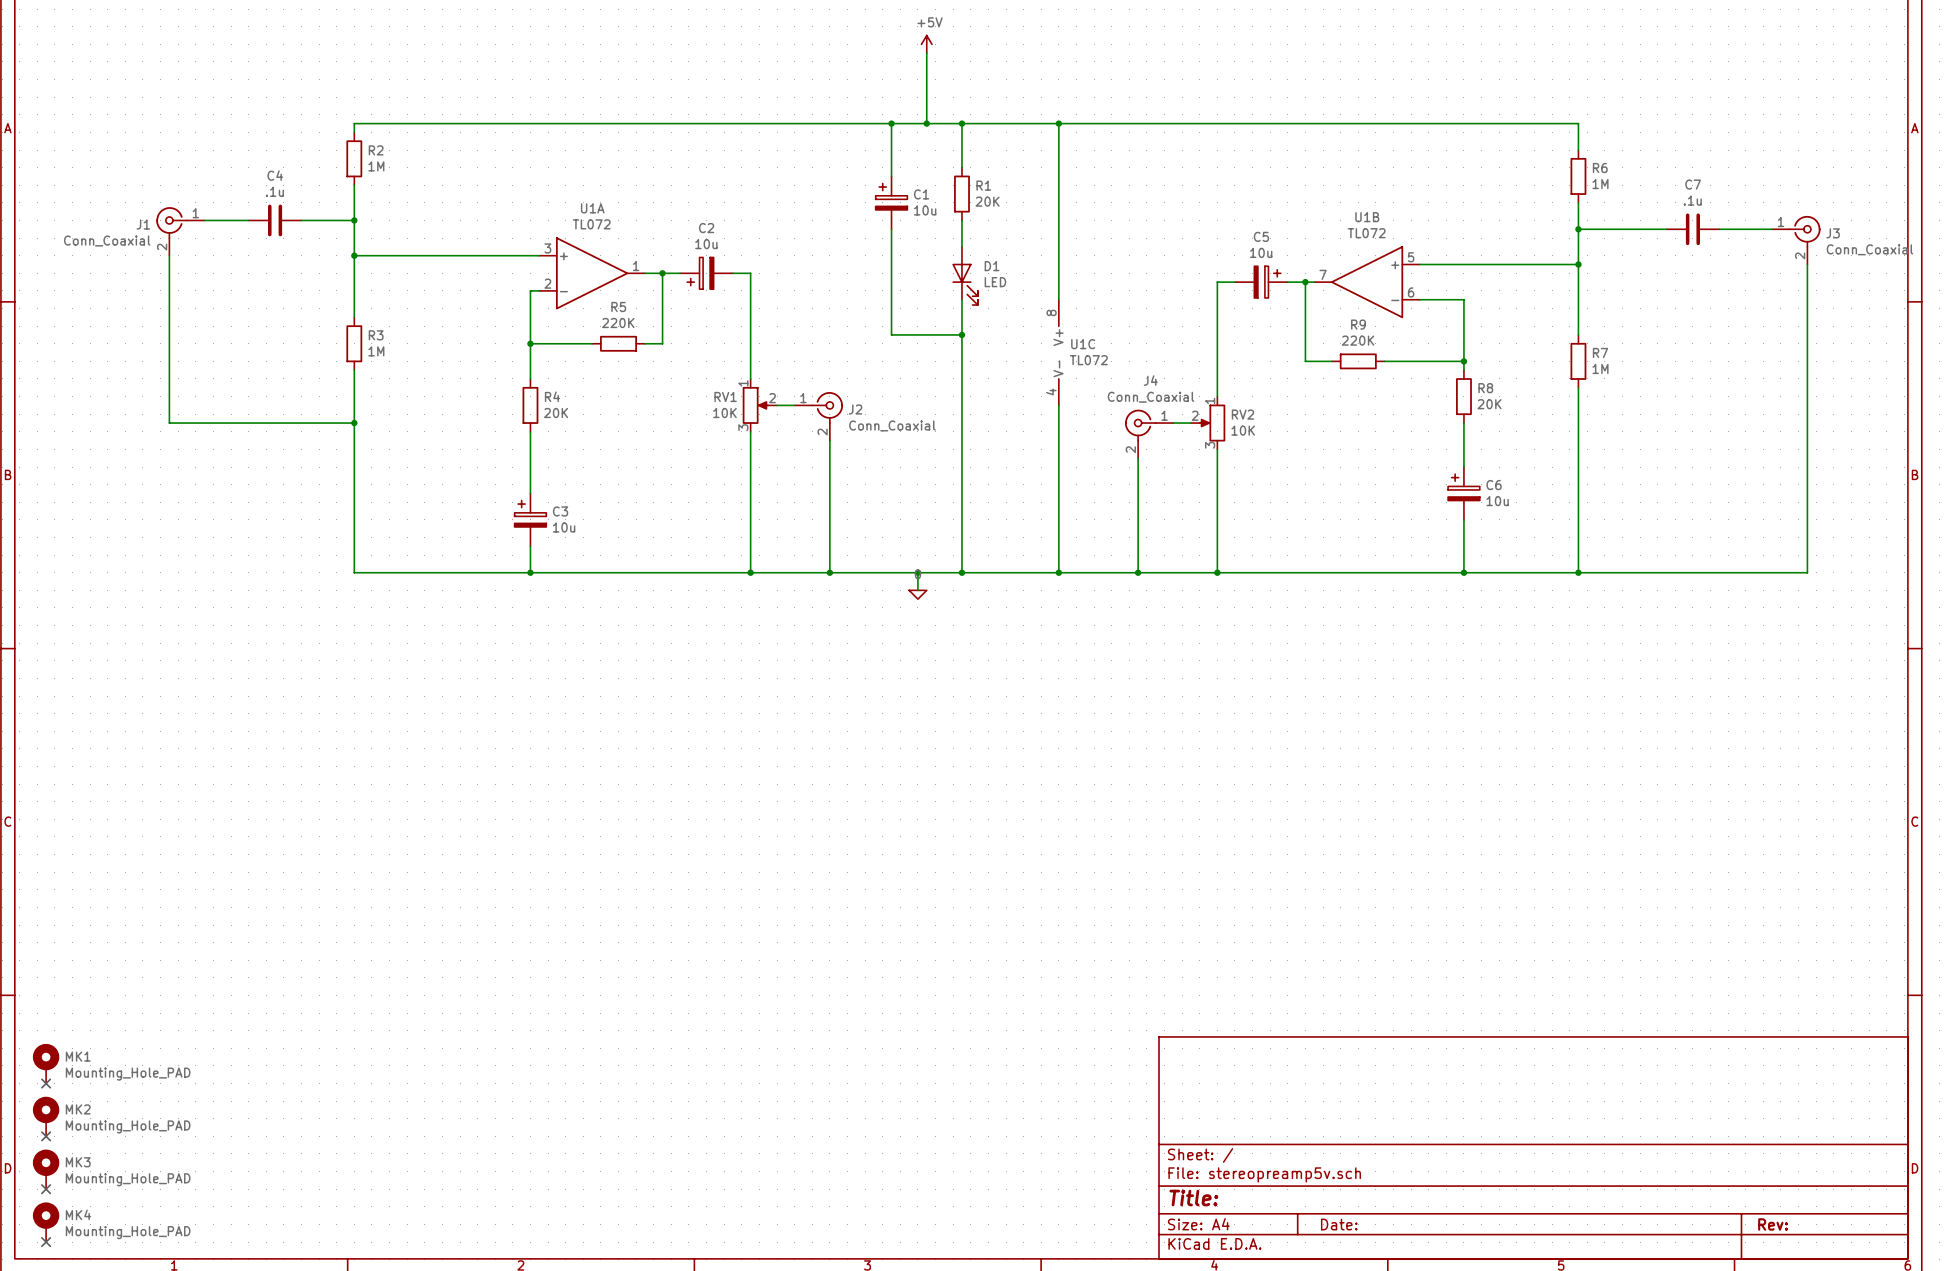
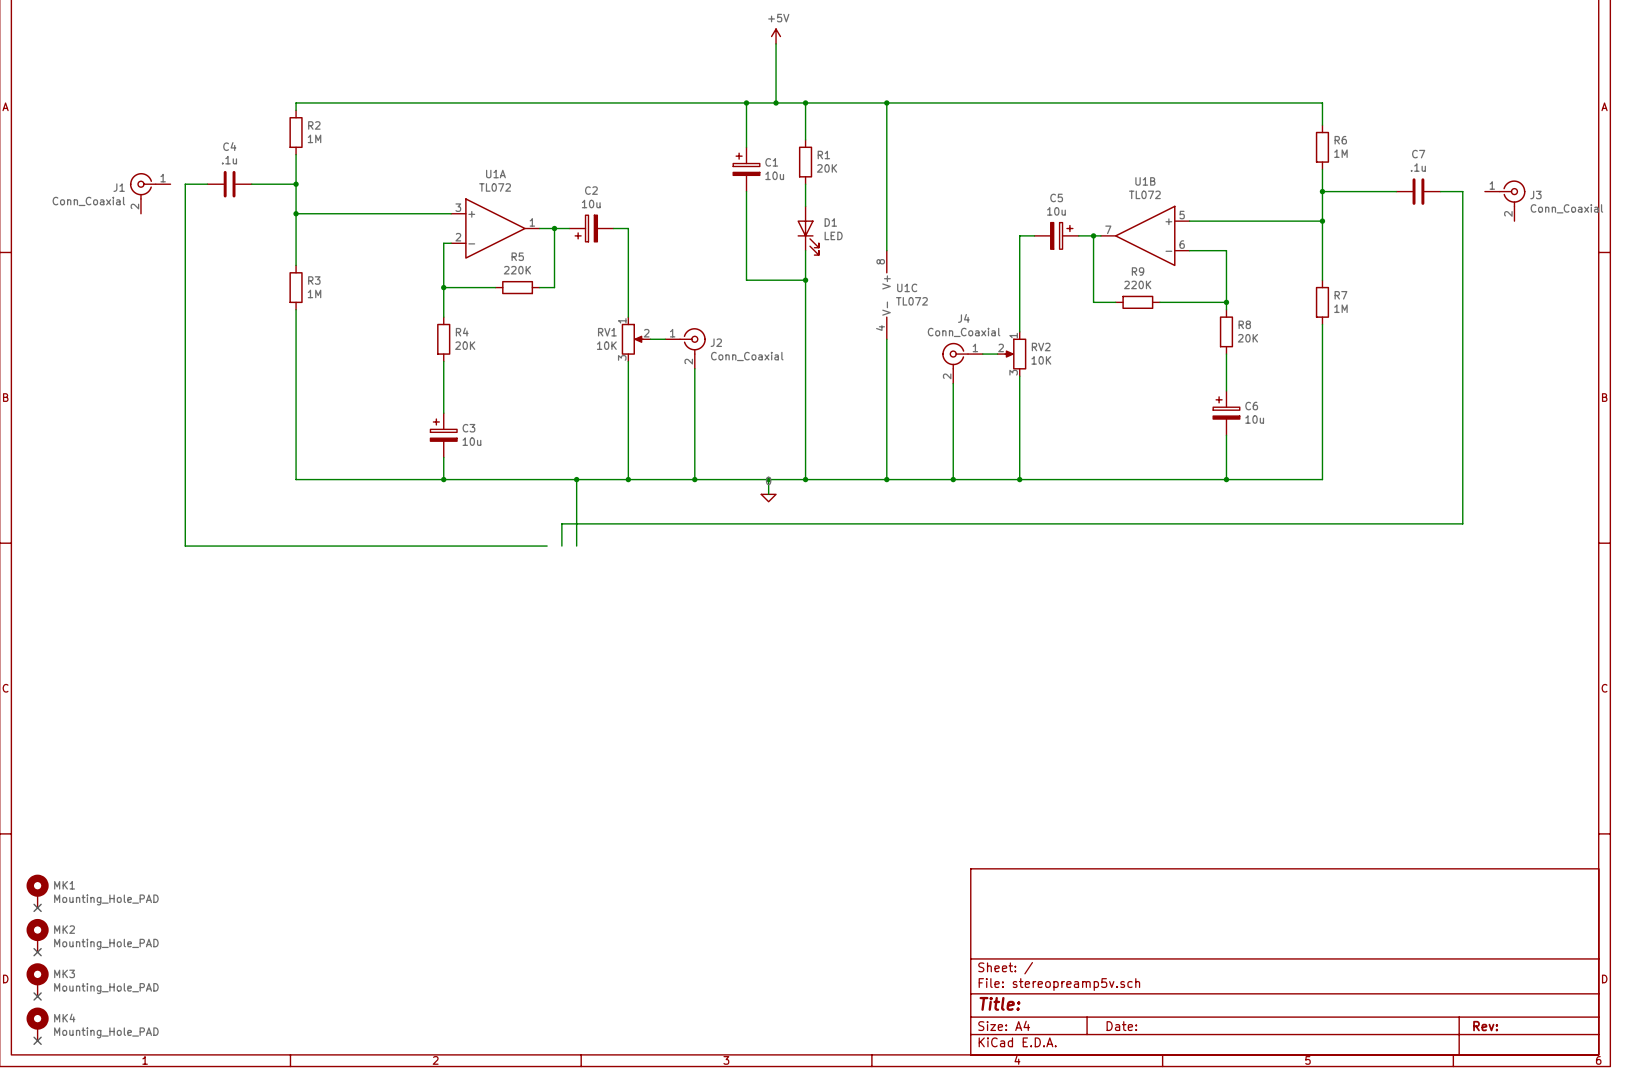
wire: (204, 220) (222, 220) -> (547, 546) (185, 546) (185, 184)
wire: (1745, 229) (1772, 229) -> (1462, 191) (1462, 523) (561, 523) (561, 546)
wire: (169, 255) (169, 423) (354, 423) -> none
wire: (1807, 264) (1807, 572) (1578, 572) -> none
junction: (354, 423) -> none
wire: none -> (576, 479) (576, 546)
junction: none -> (576, 479)
junction: (1578, 572) -> none

